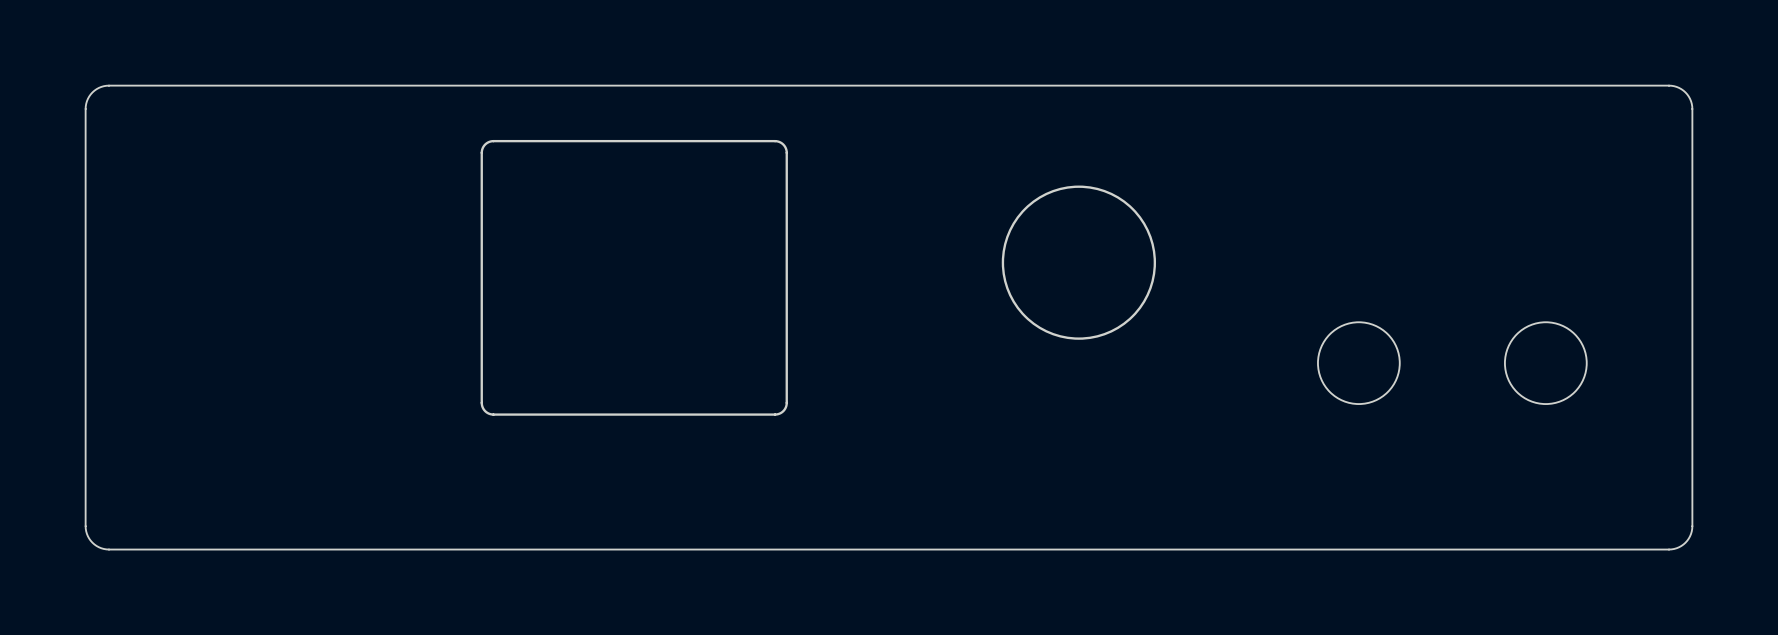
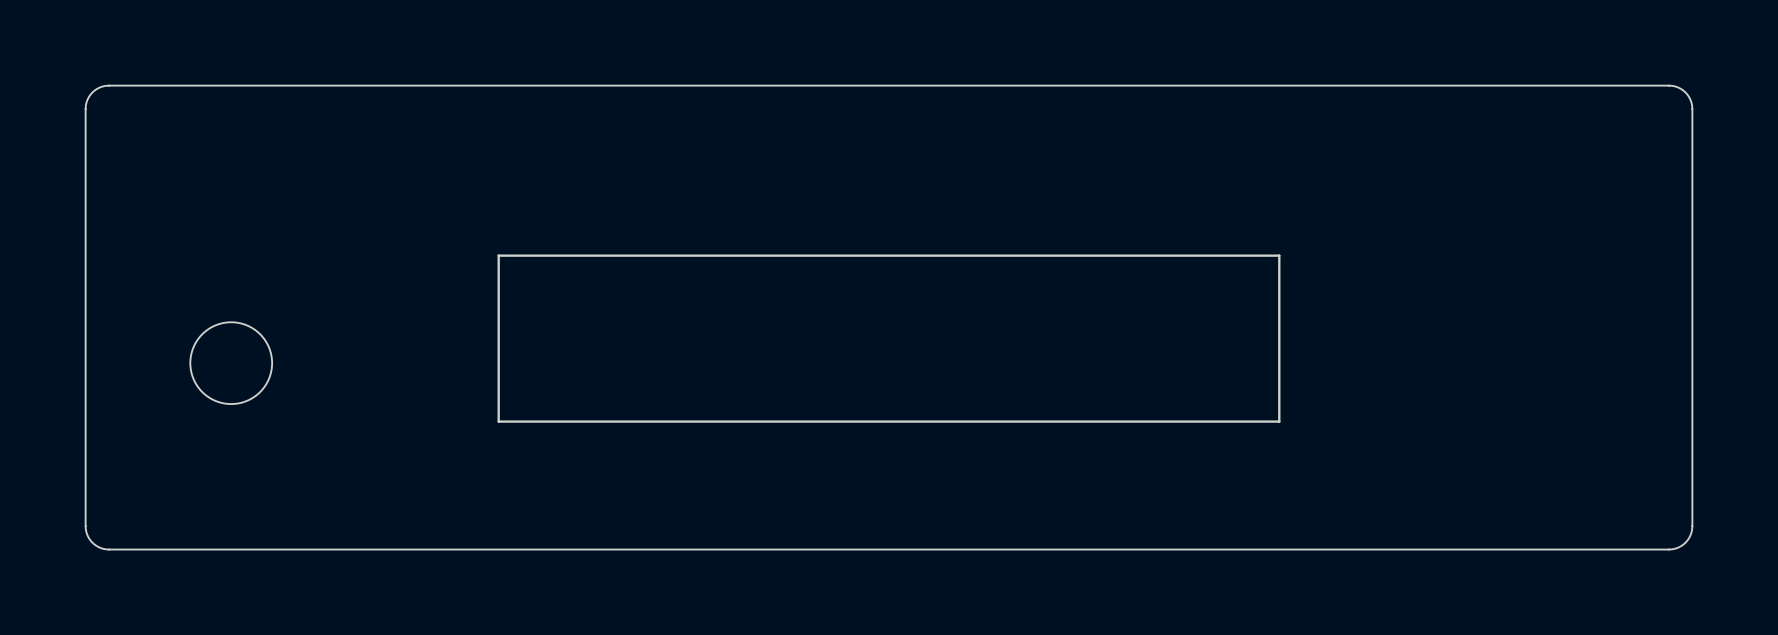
board edge: (775, 141) (493, 141) (485, 144) (481, 152) (481, 402) (485, 411) (493, 414) (775, 414) (783, 411) (786, 402) (786, 152) (783, 144) (775, 141) -> none
round board edge: [1001, 185, 1157, 340] -> none
board edge: none -> (1279, 255) (498, 255) (498, 421) (1279, 421) (1279, 255)
round board edge: none -> [189, 321, 273, 405]
round board edge: [1317, 321, 1401, 405] -> none
round board edge: [1504, 321, 1588, 405] -> none

